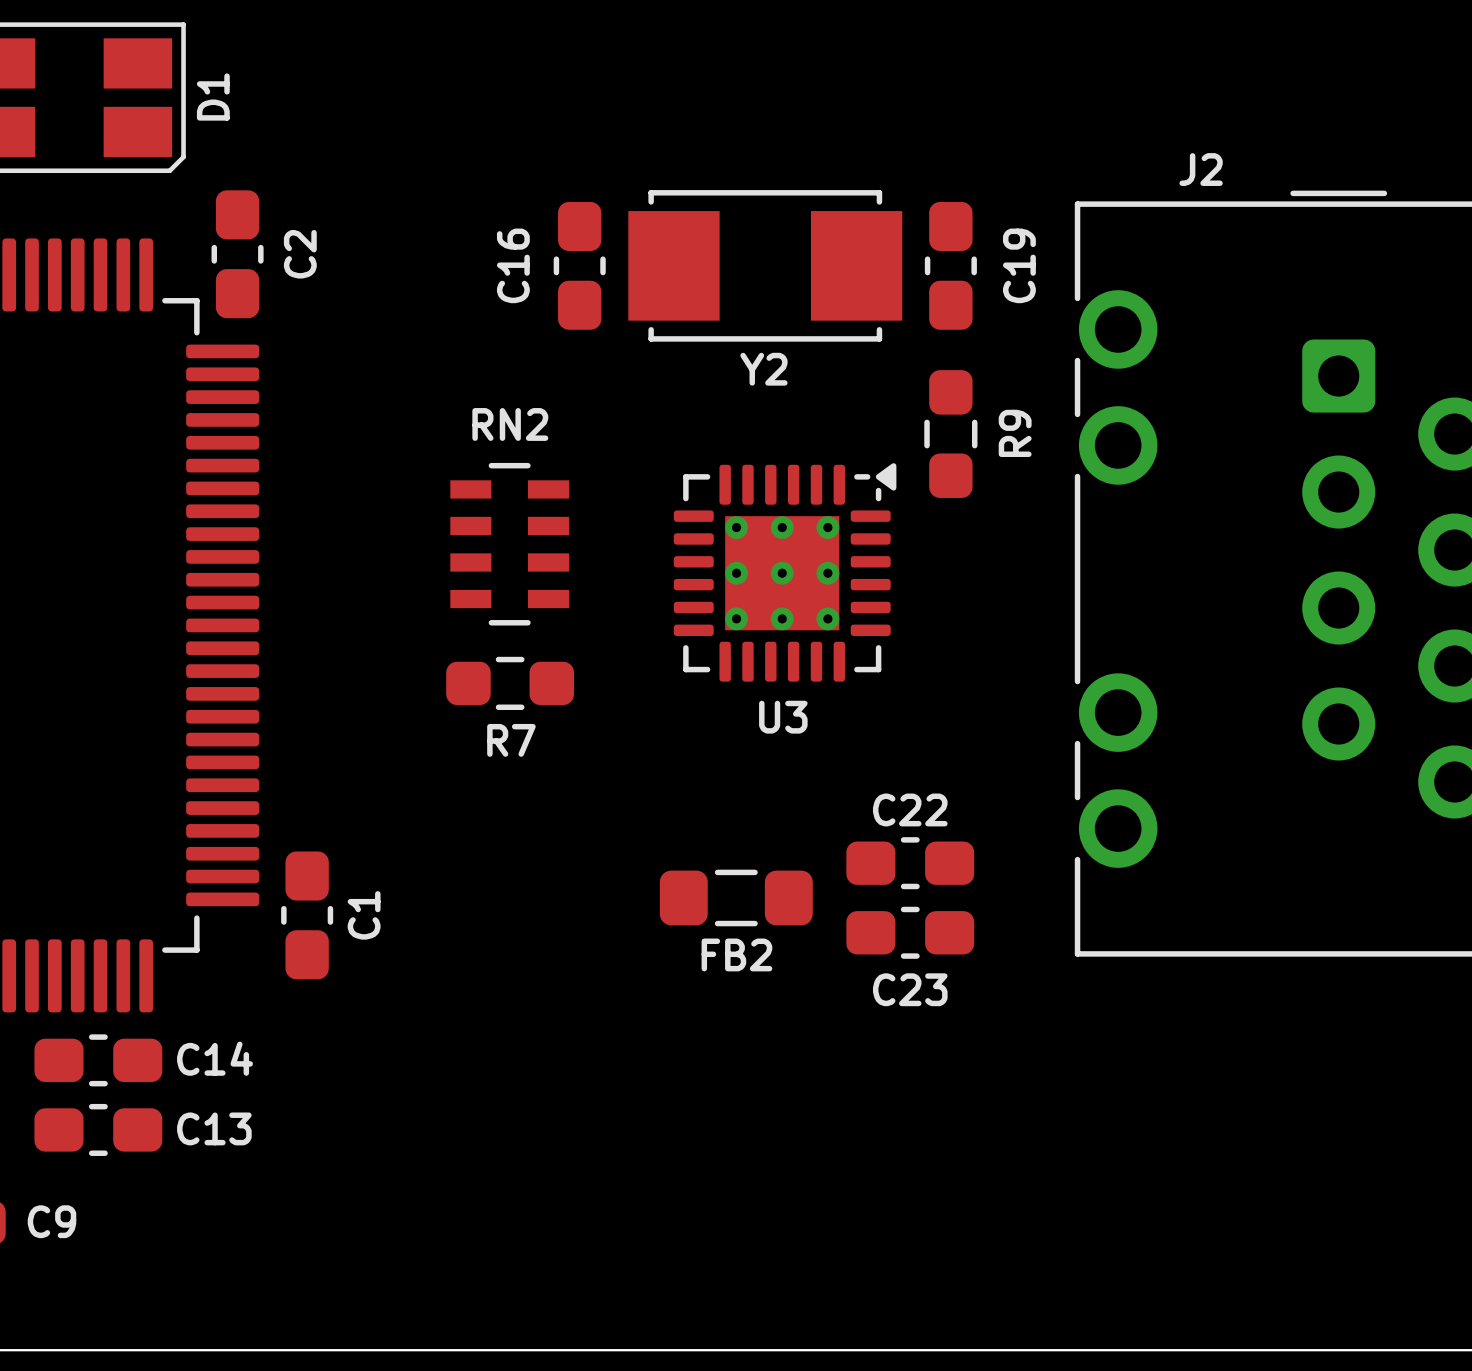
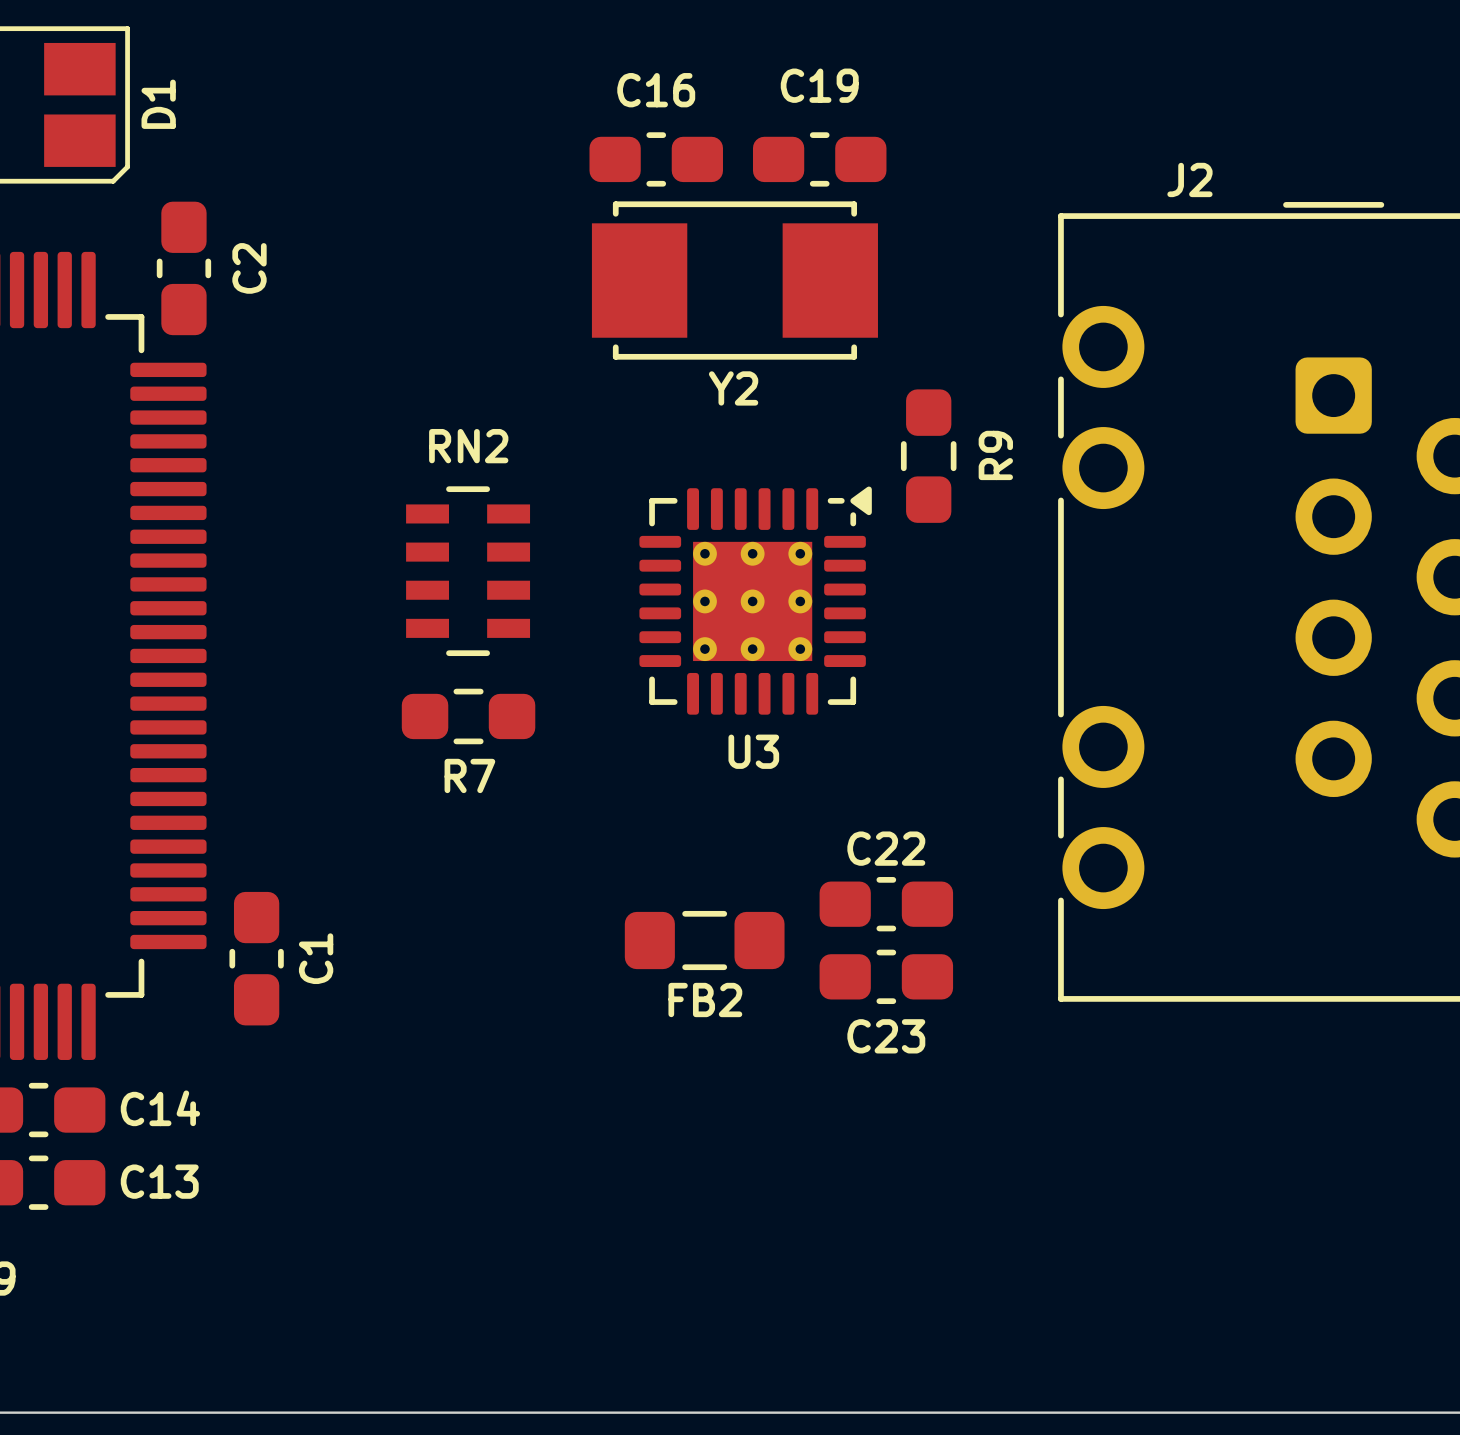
C16 rotation: 0° (579, 265) -> 90° clockwise (656, 159)
C16 position: (579, 265) -> (656, 159)
C19 rotation: 0° (950, 265) -> 90° clockwise (819, 159)
C19 position: (950, 265) -> (819, 159)
C19 name position: C19 (1019, 265) -> C19 (819, 85)

